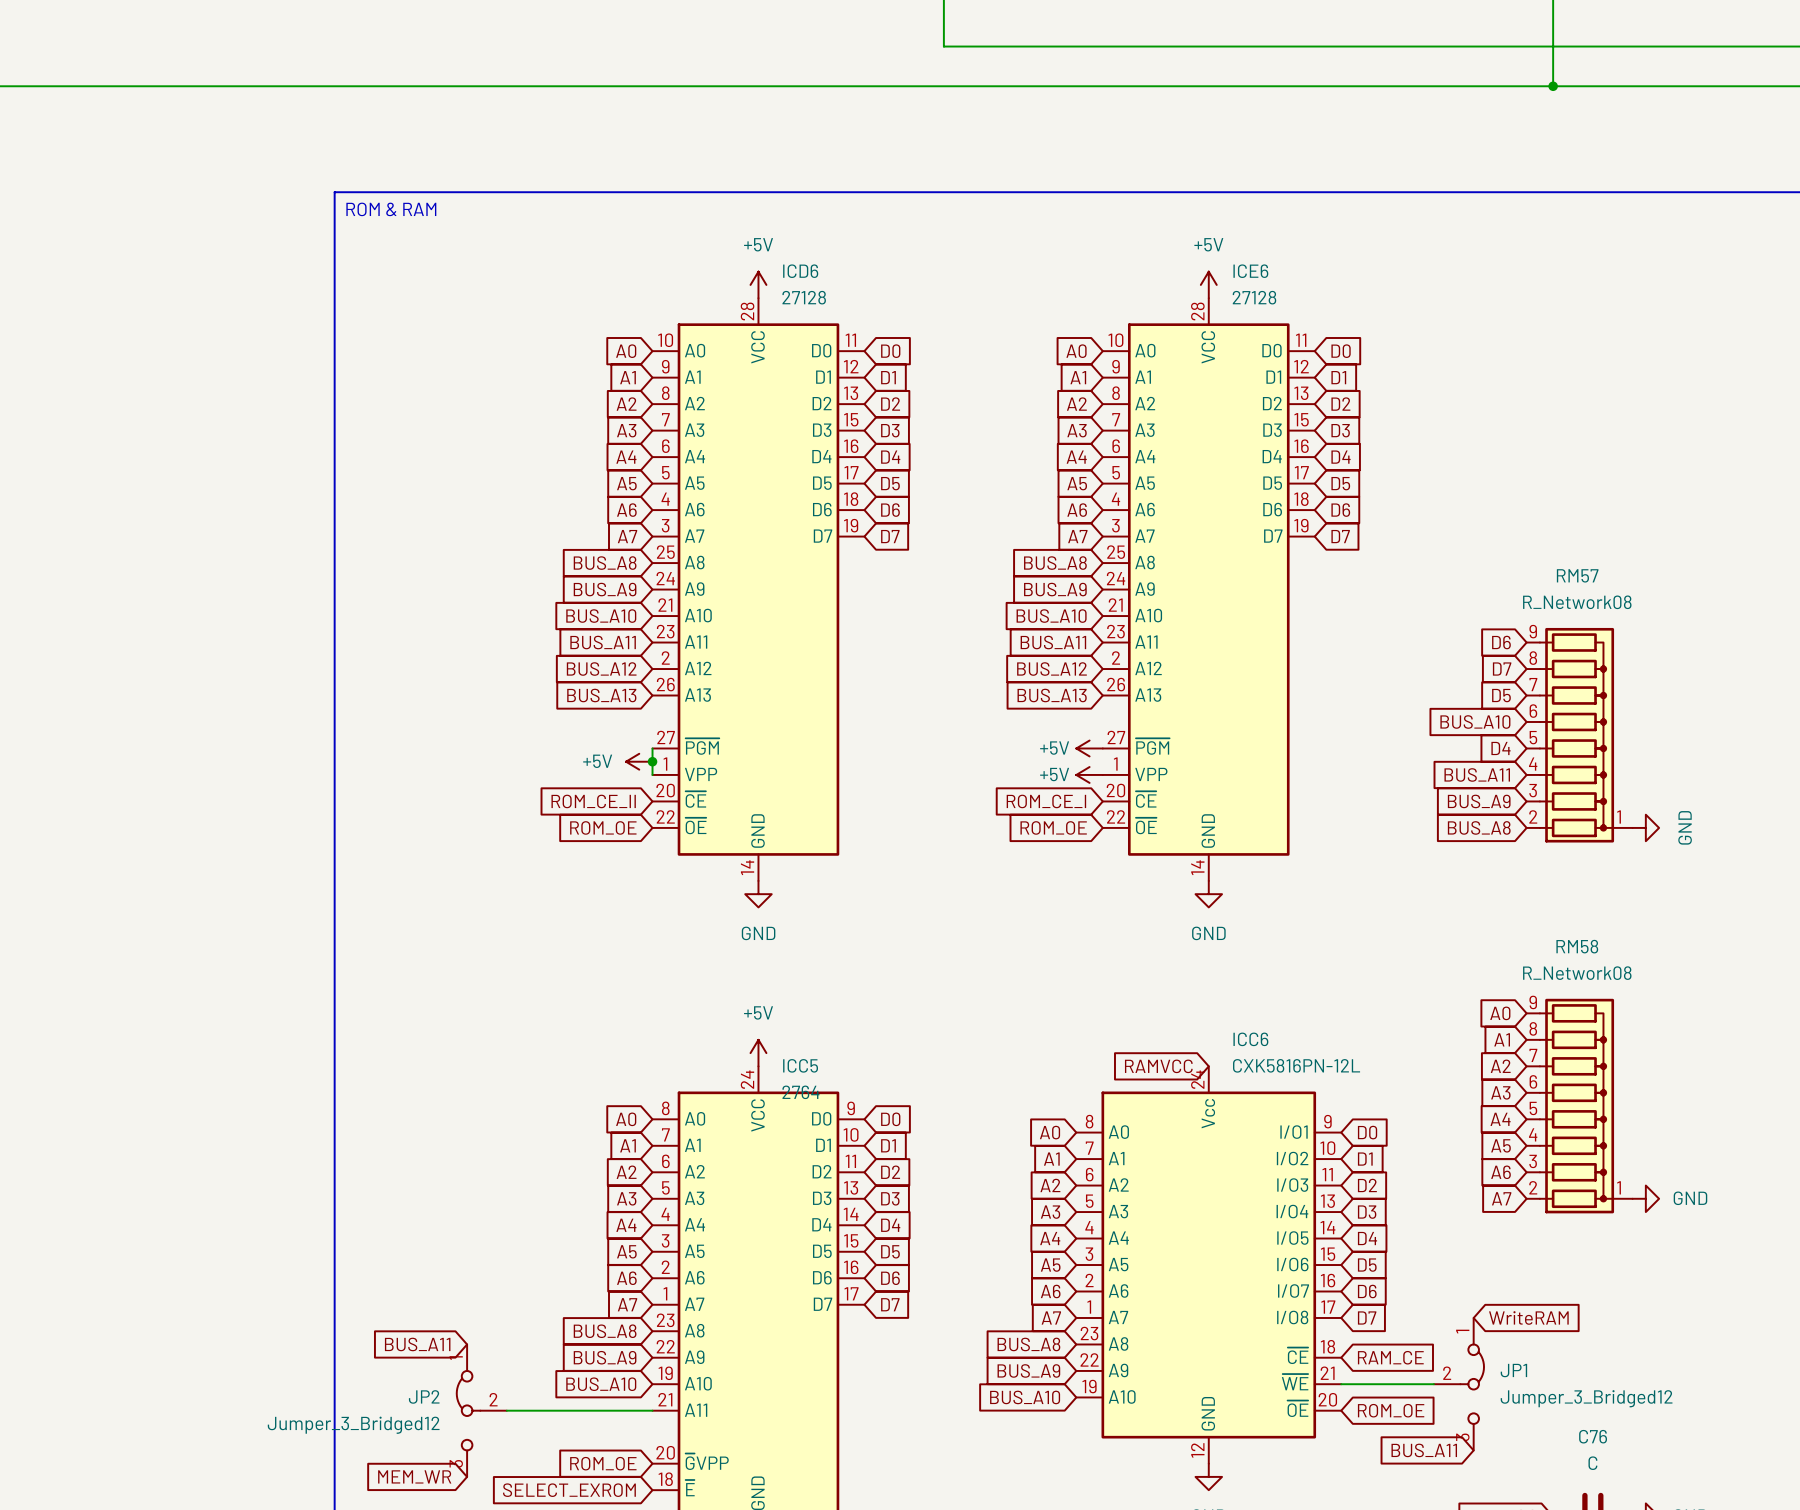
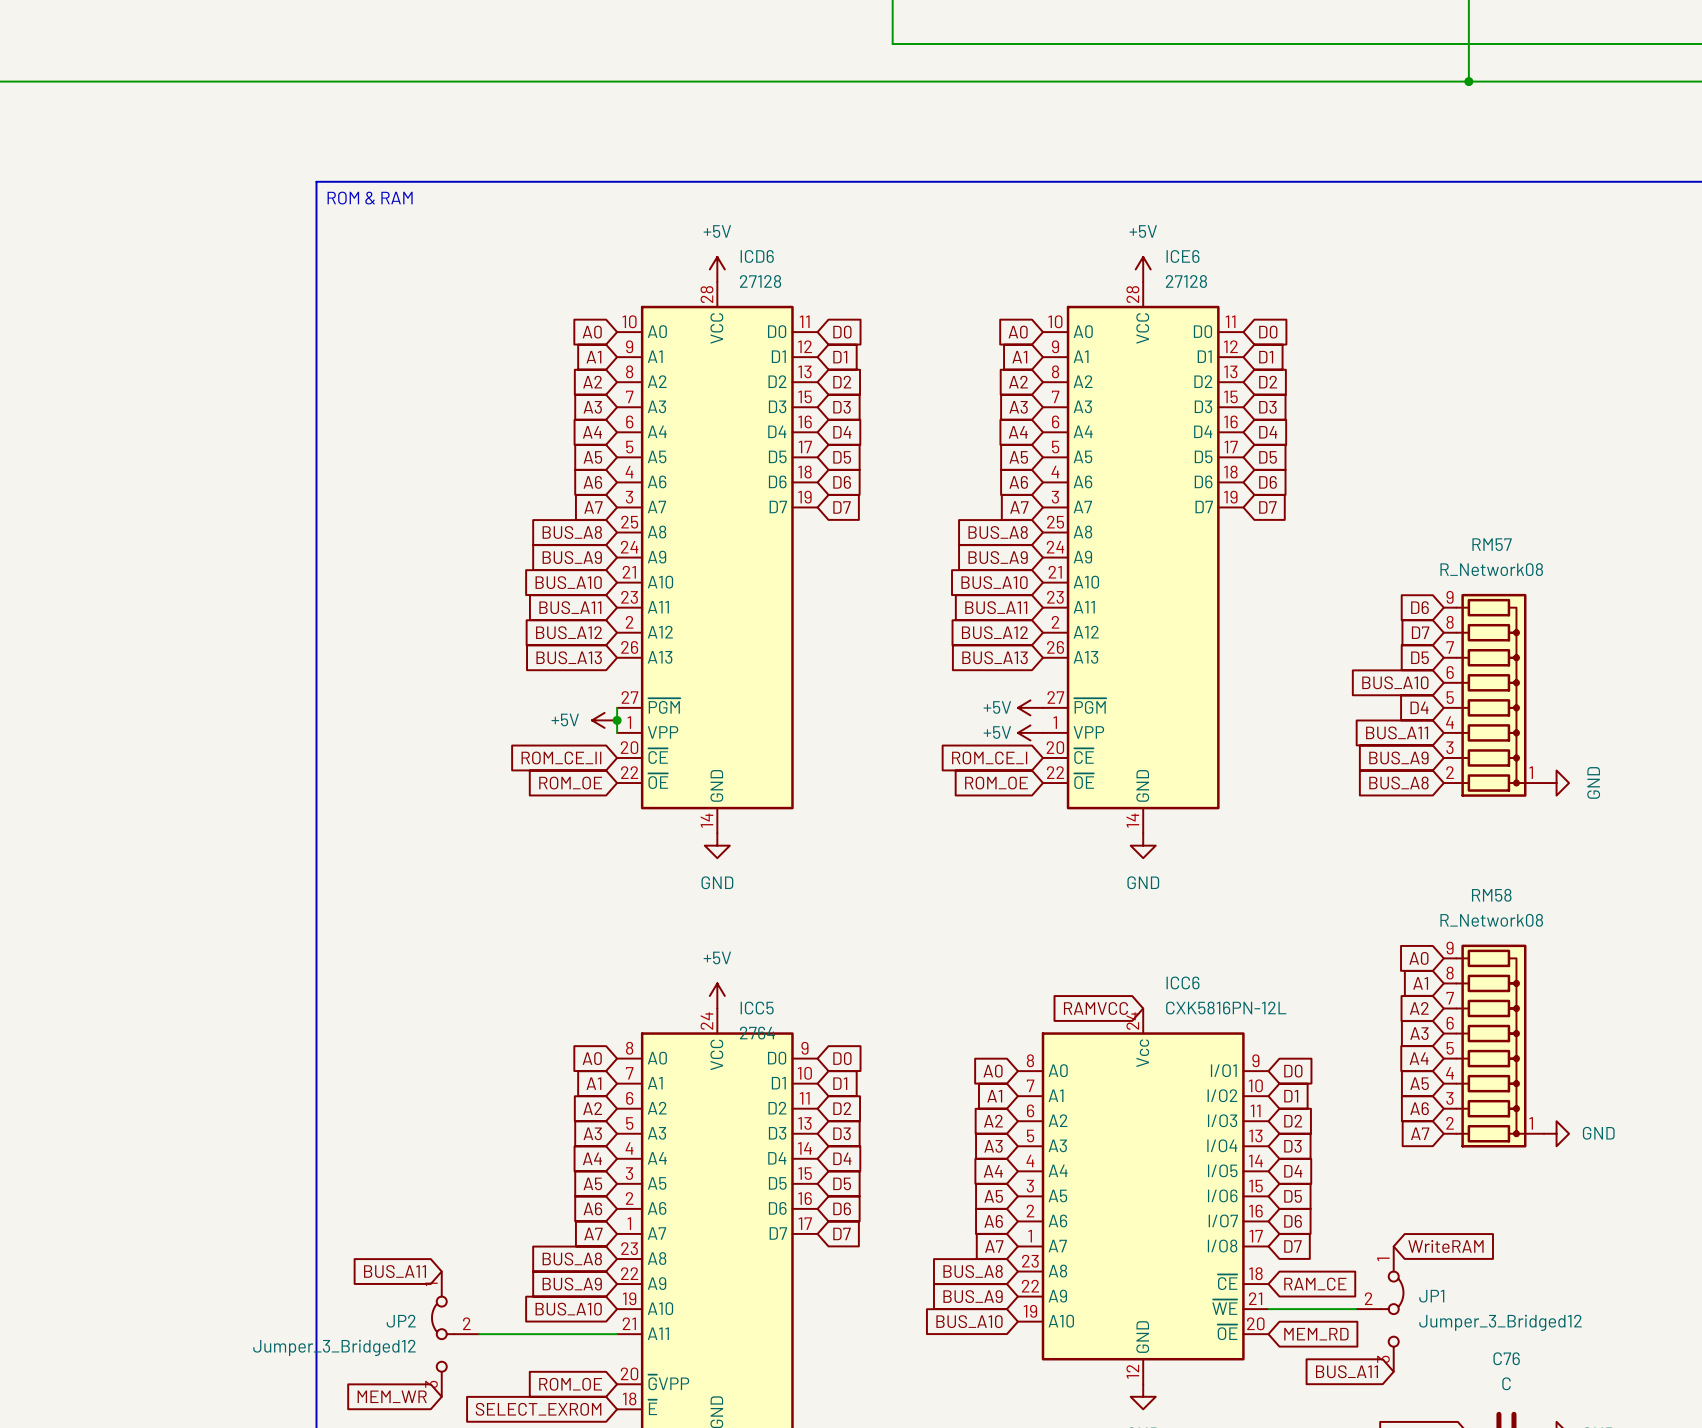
global label: ROM_OE (1391, 1410) -> MEM_RD (1316, 1334)

